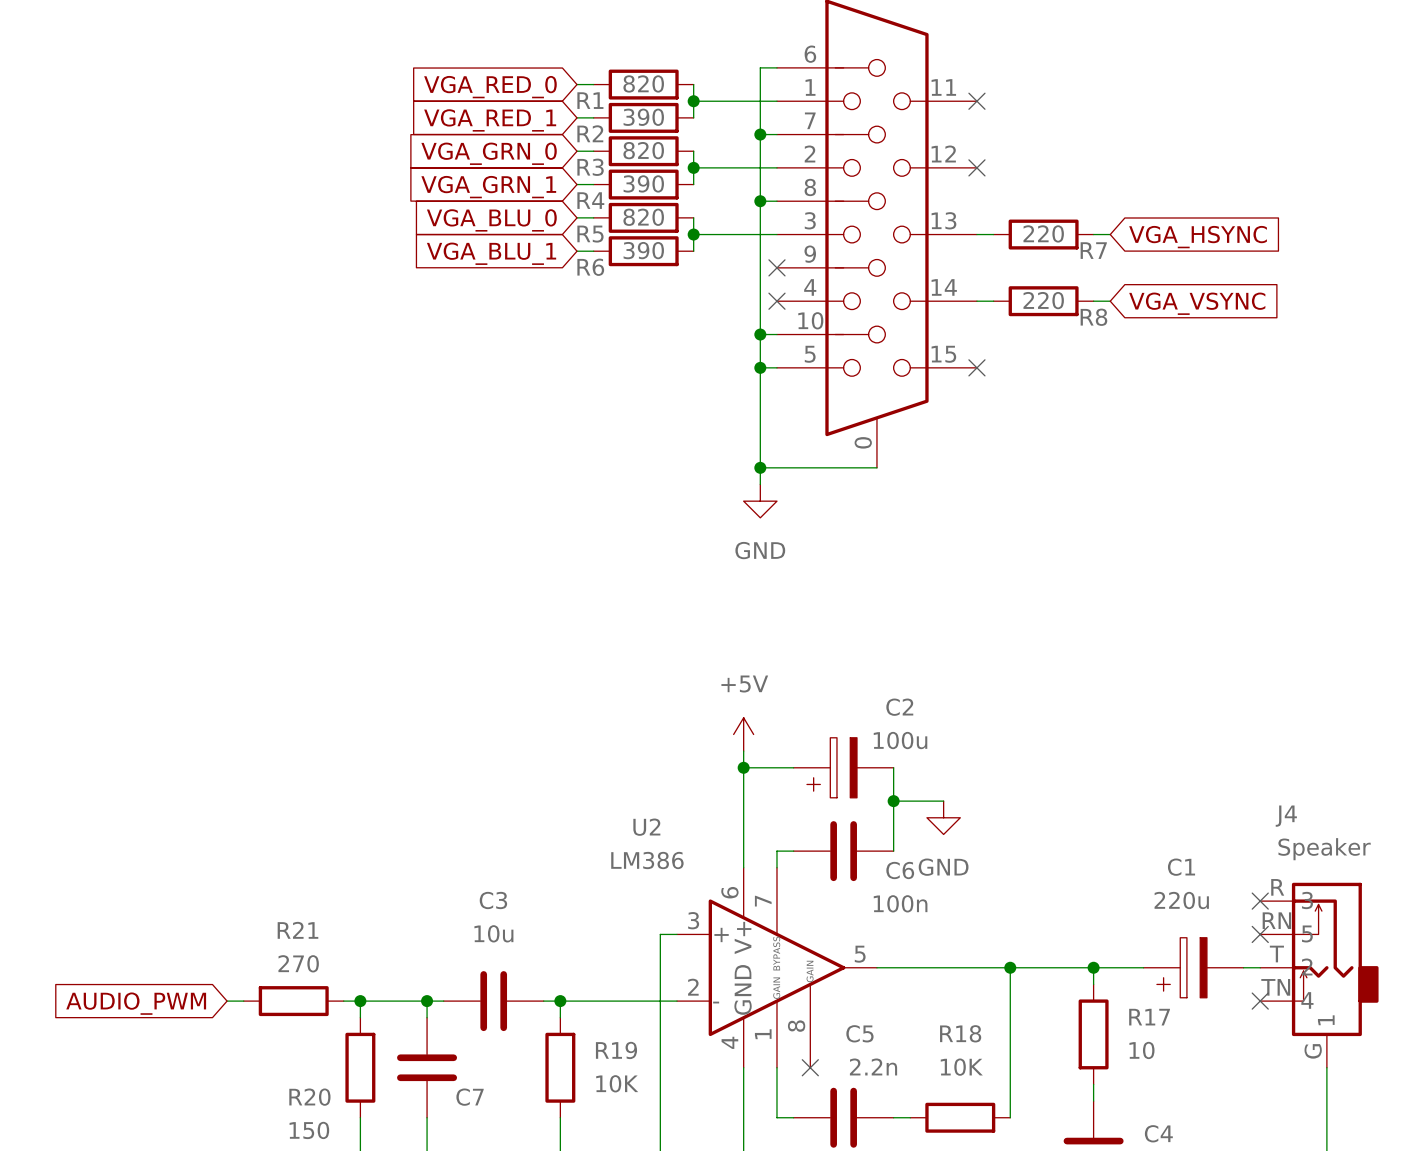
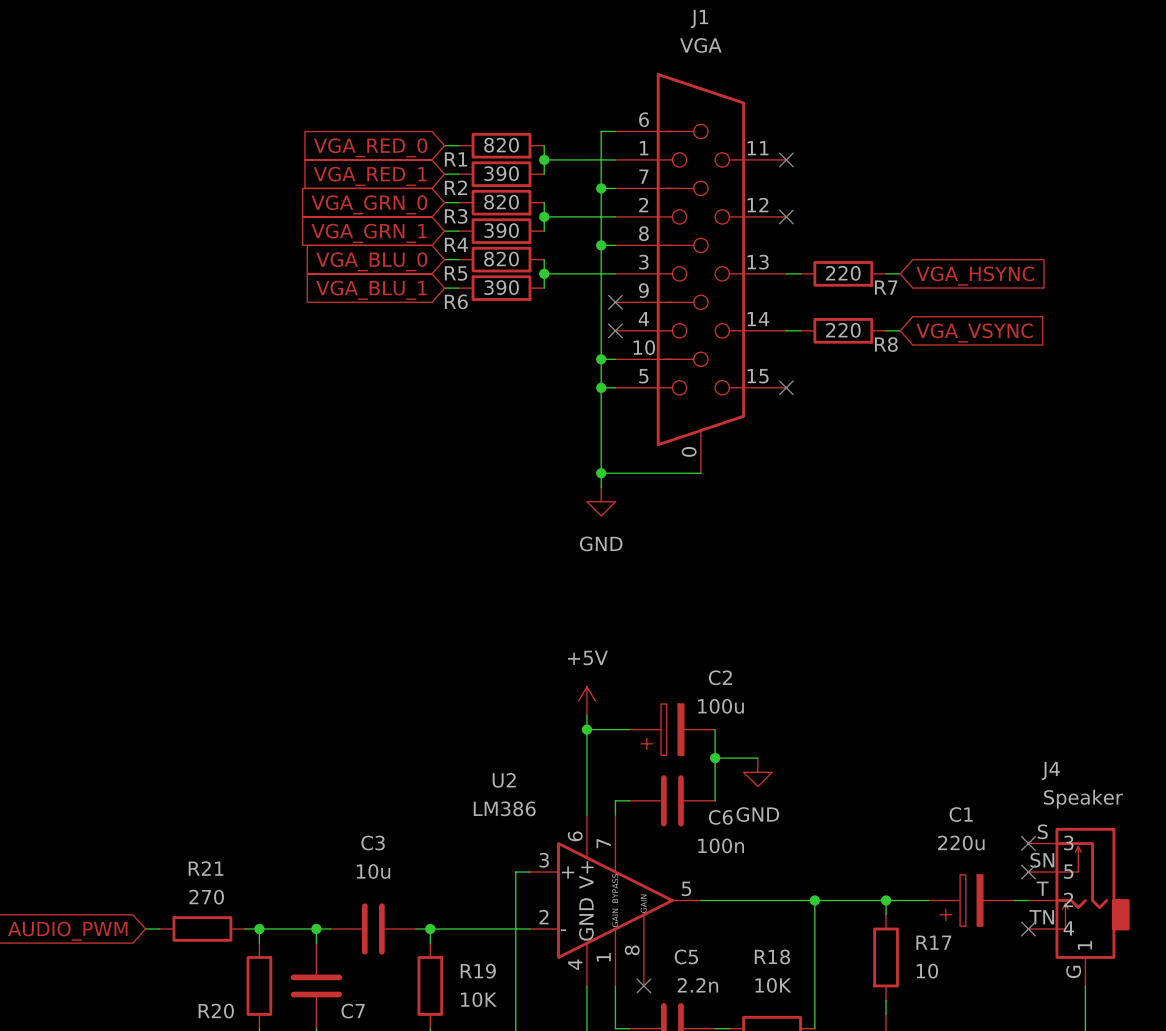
J4 pin number: R (1277, 887) -> S (1042, 831)
J4 pin number: RN (1276, 920) -> SN (1042, 860)

